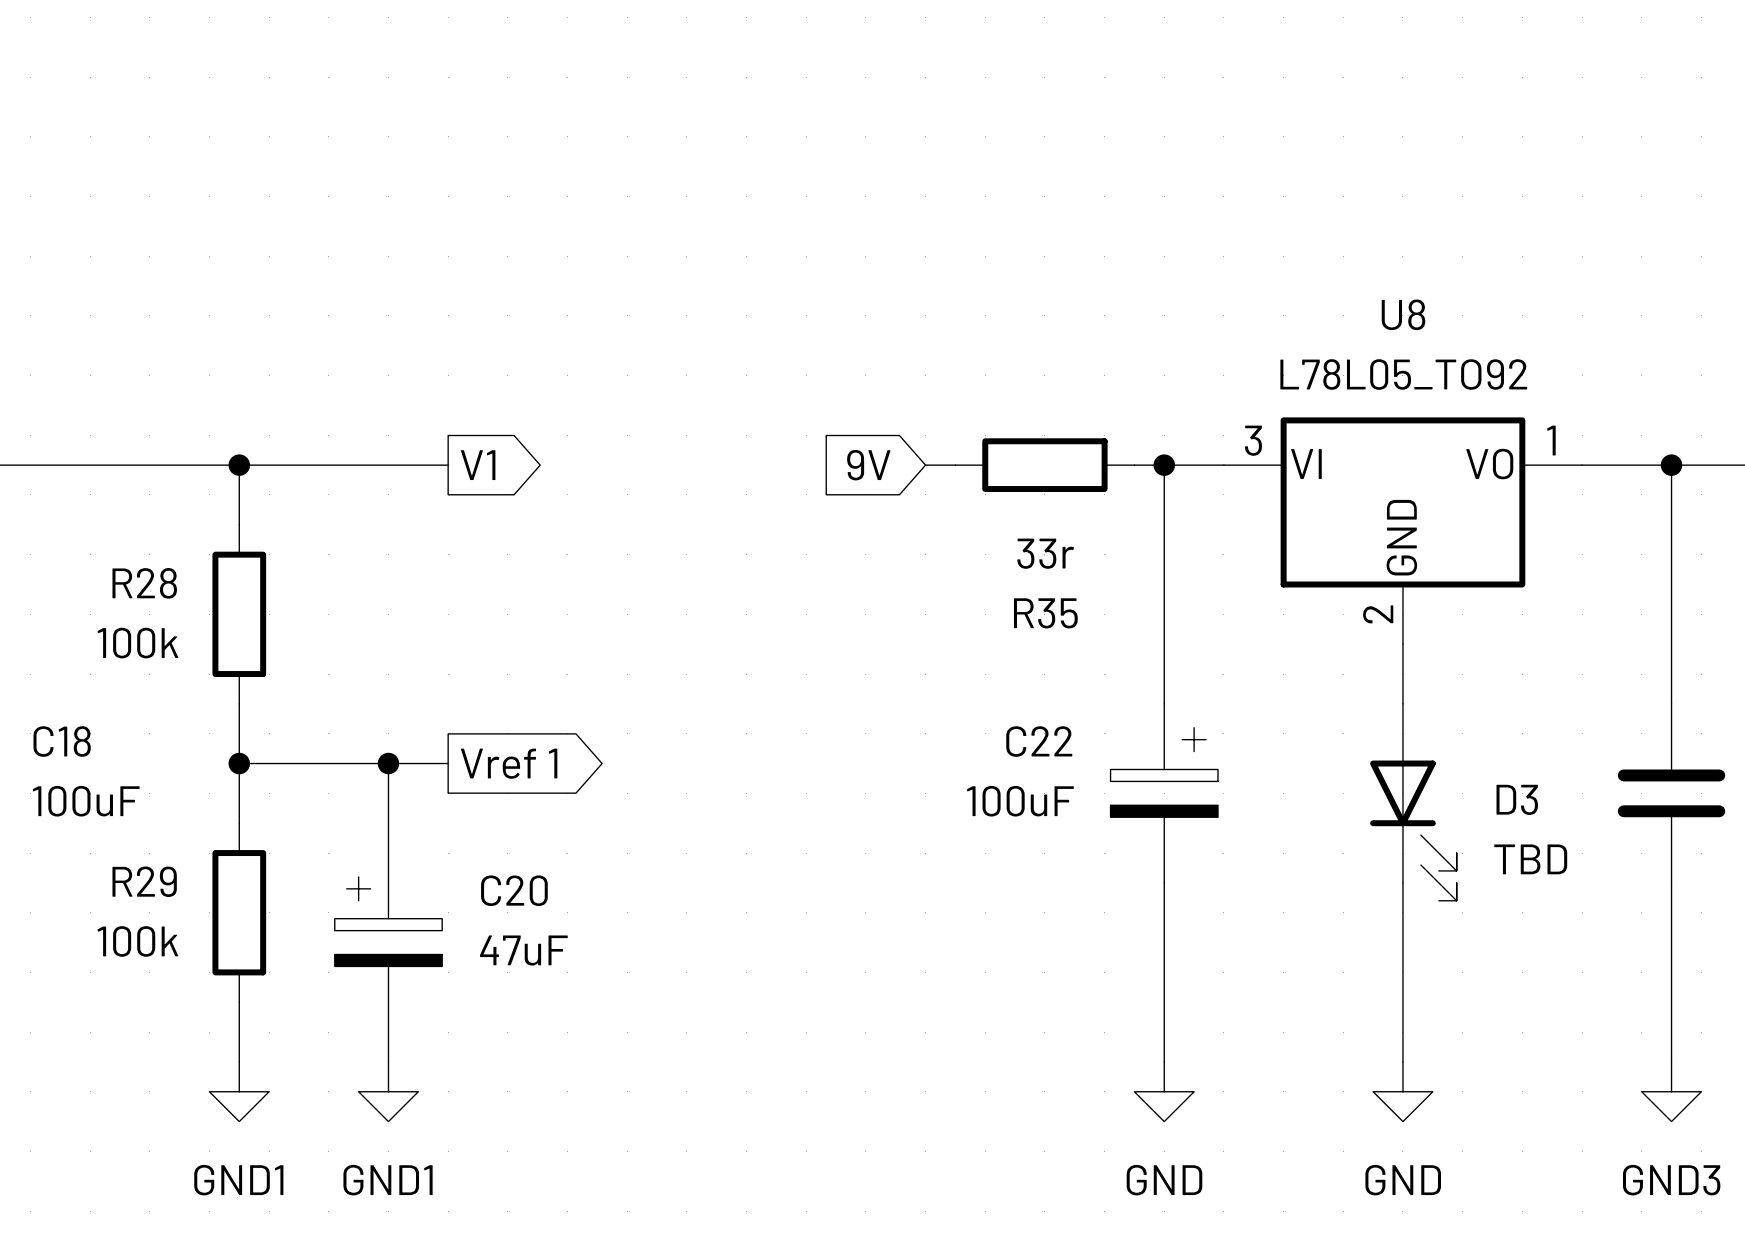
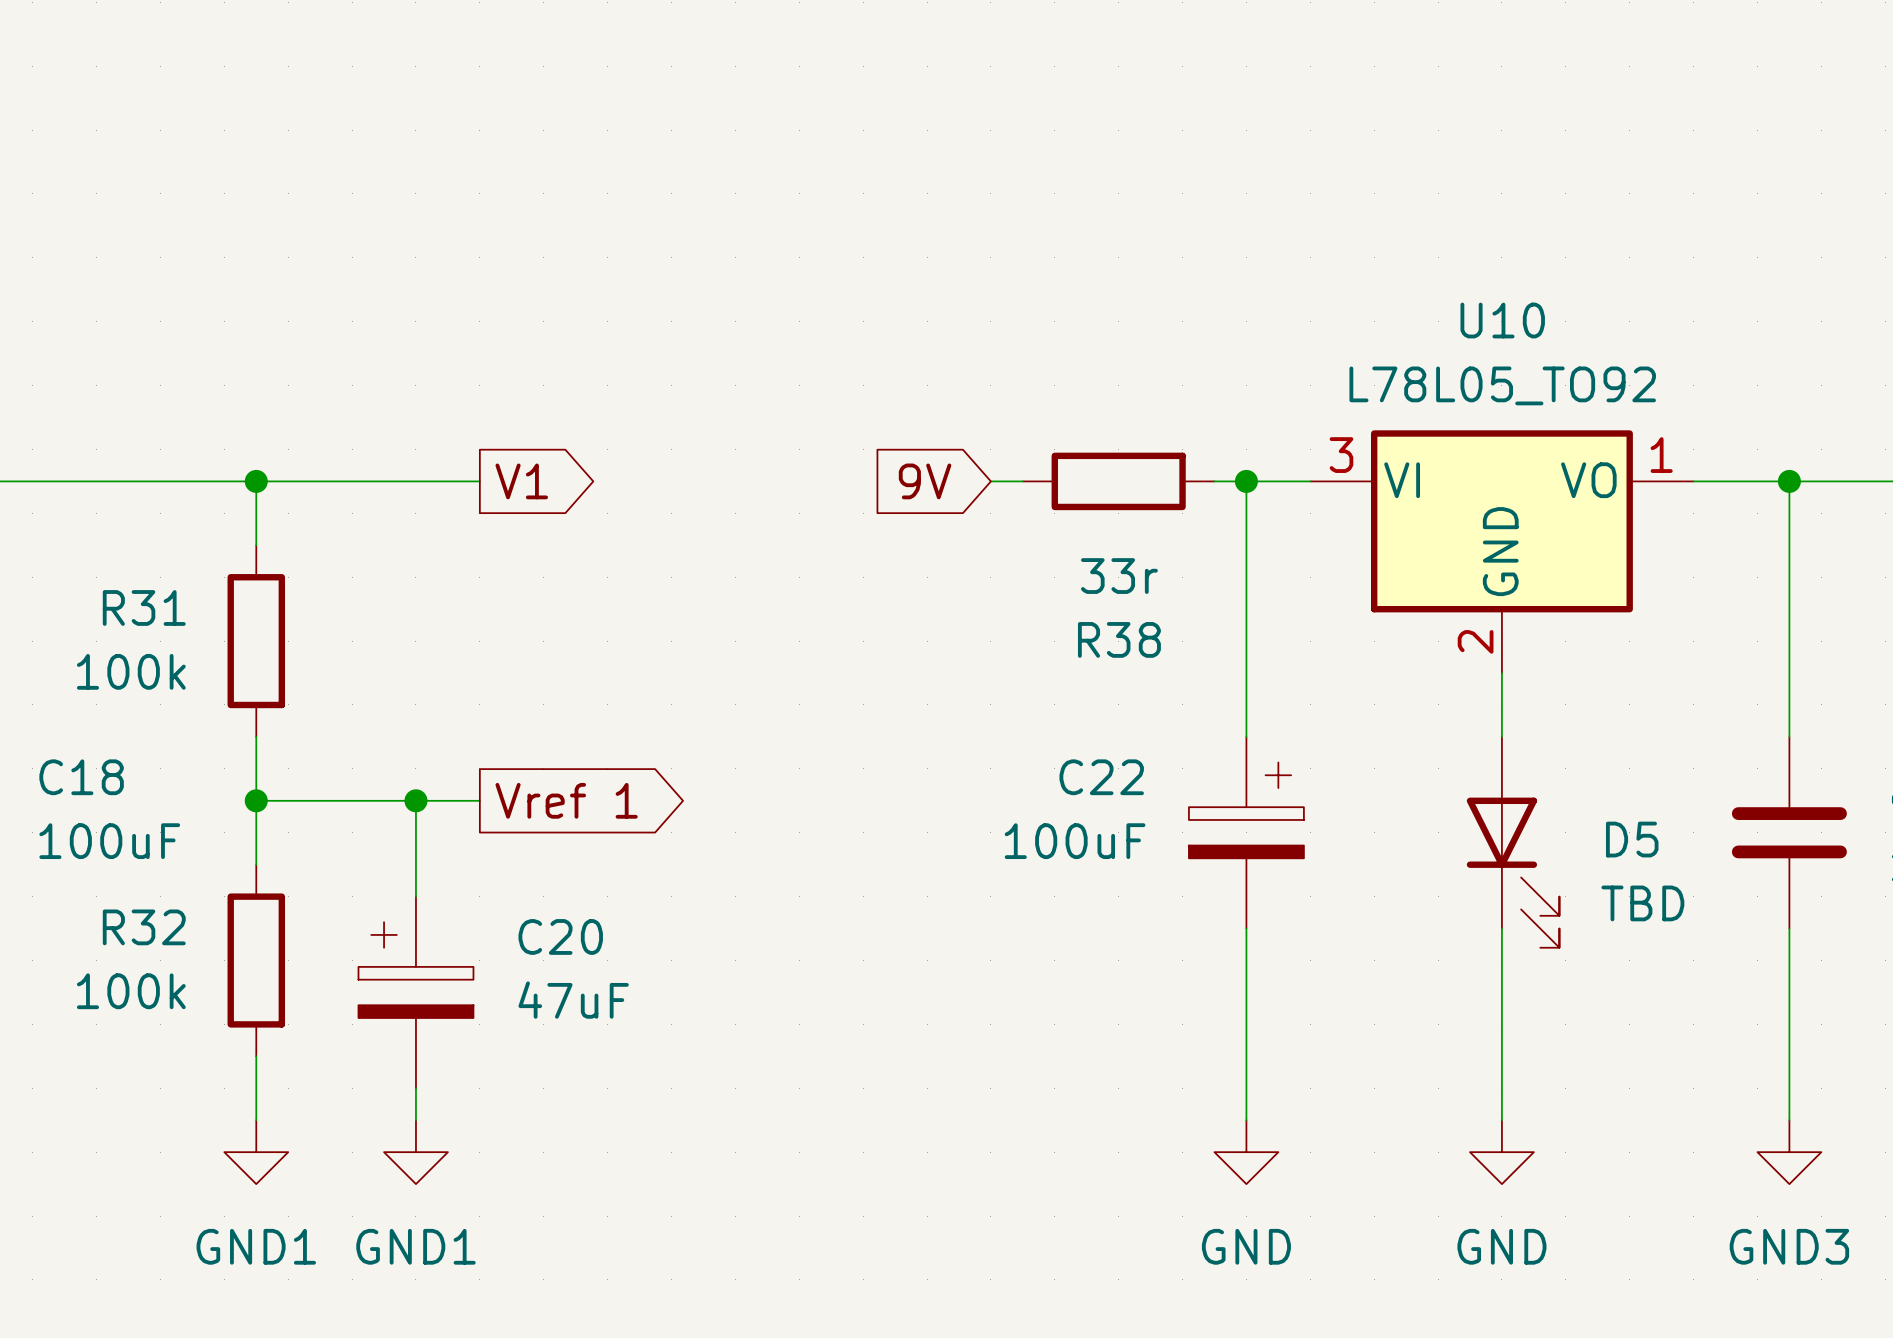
U8 name: U8 (1403, 314) -> U10 (1502, 320)
R28 name: R28 (144, 583) -> R31 (144, 607)
R35 name: R35 (1045, 613) -> R38 (1119, 639)
D3 name: D3 (1517, 799) -> D5 (1632, 839)
R29 name: R29 (144, 881) -> R32 (144, 927)

